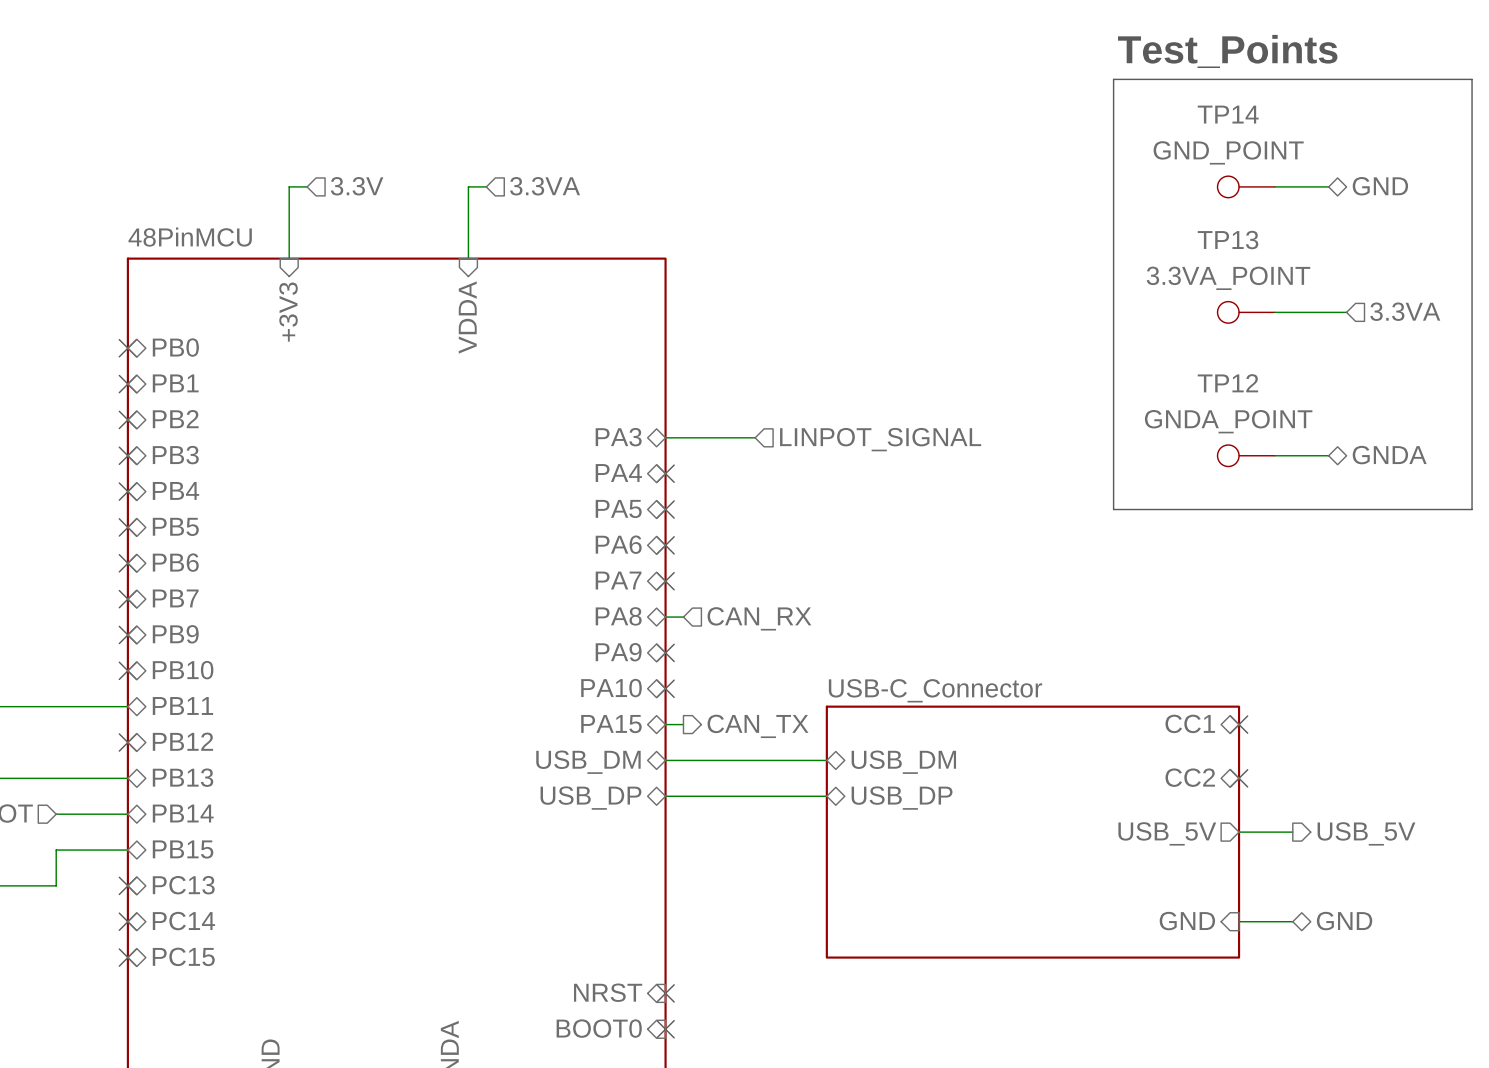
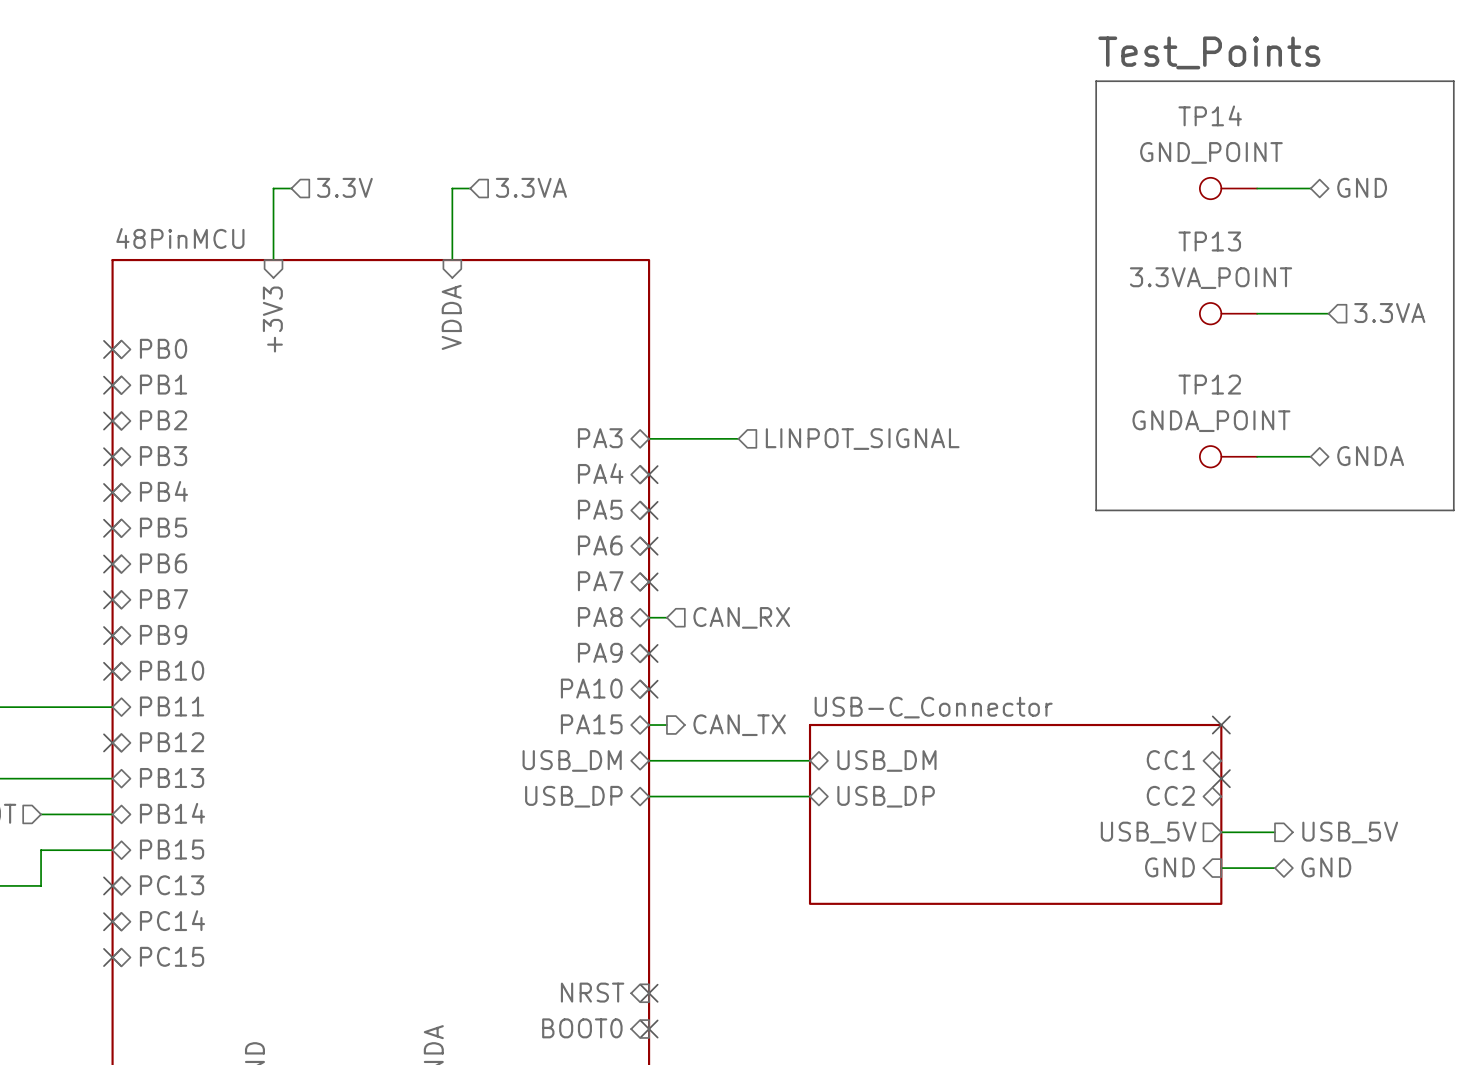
sheet pin position: CC1 (1190, 723) -> CC1 (1170, 760)
sheet pin position: CC2 (1190, 777) -> CC2 (1170, 795)
sheet USB-C_Connector: none -> (1015, 814)
sheet USB-C_Connector: (1032, 832) -> none
sheet pin position: GND (1187, 921) -> GND (1169, 867)
wire: (1239, 921) (1292, 921) -> (1221, 868) (1274, 868)
hierarchical label position: GND (1344, 921) -> GND (1326, 867)

